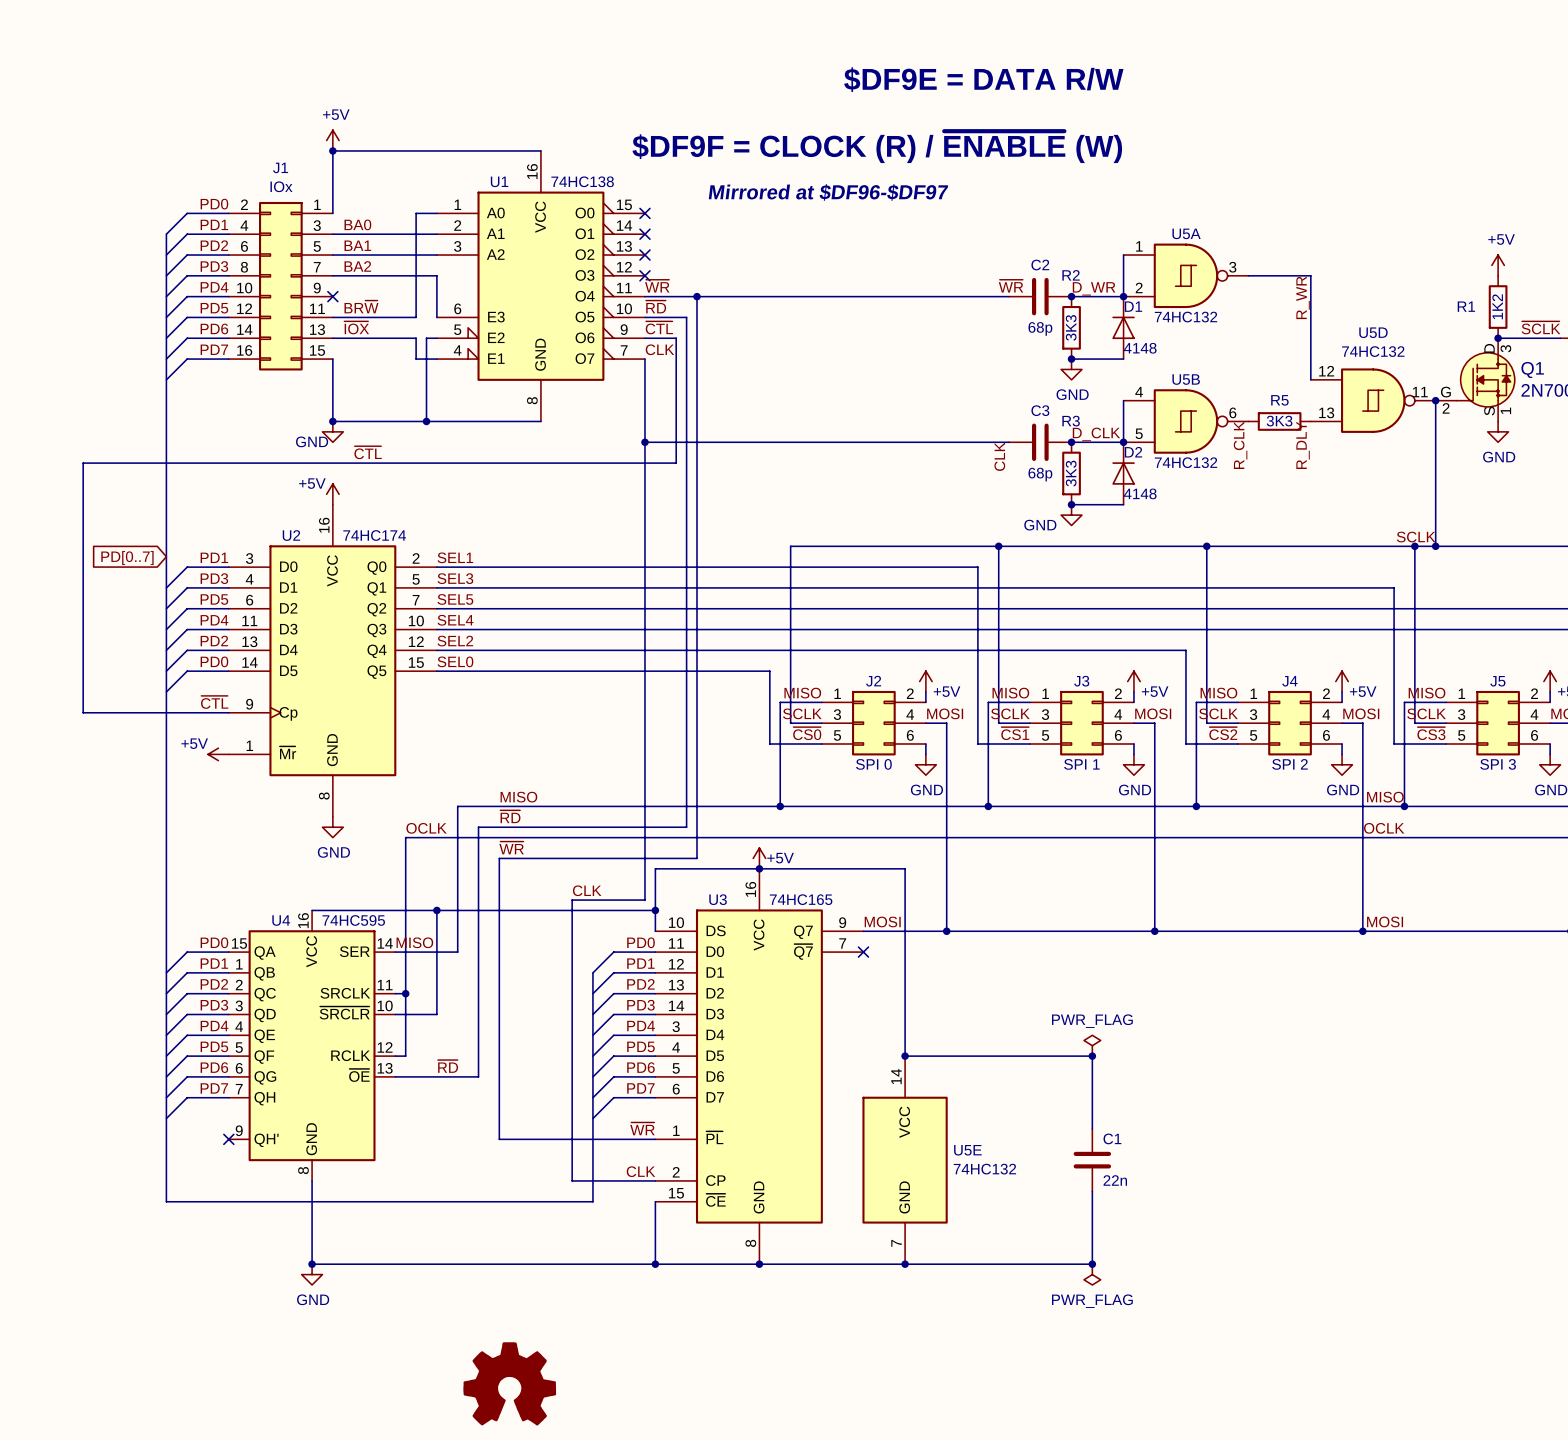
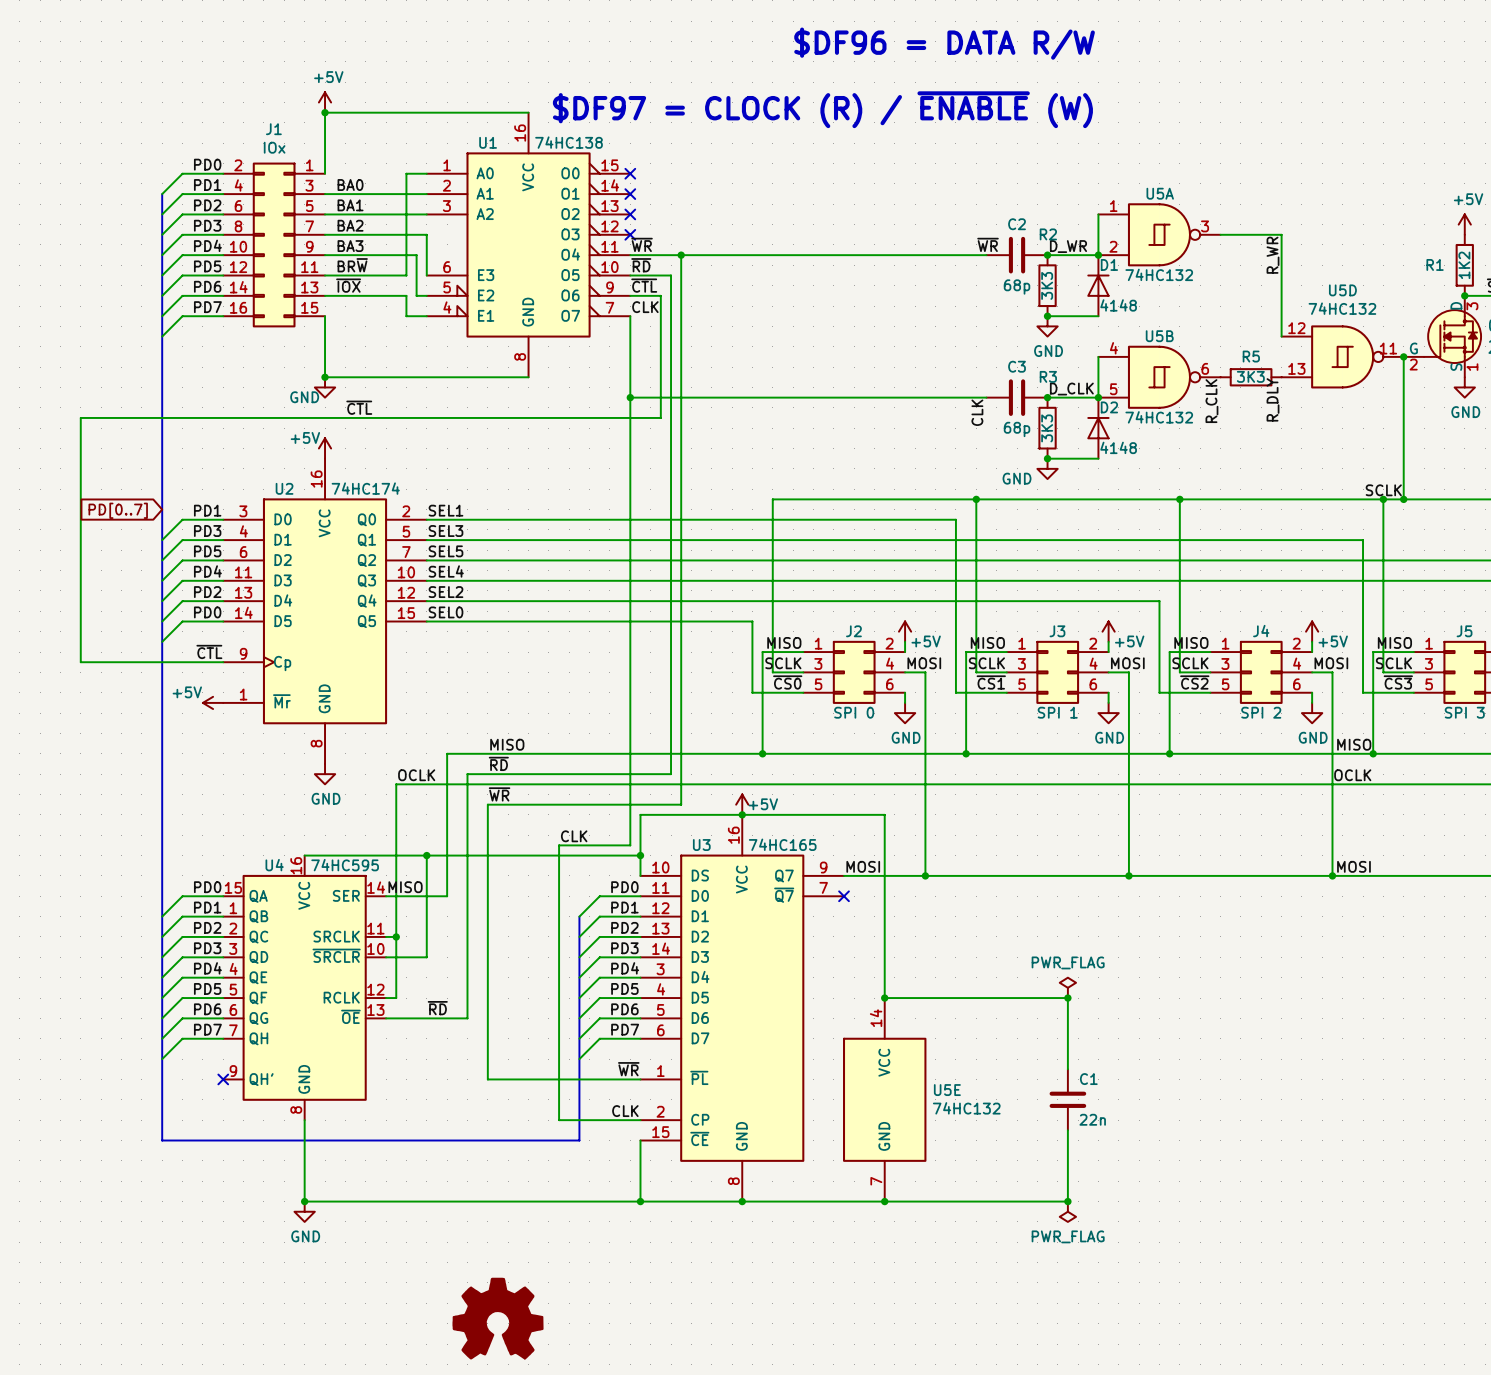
text: $DF9E = DATA R/W (983, 79) -> $DF96 = DATA R/W (944, 43)
text: $DF9F = CLOCK (R) / ~{ENABLE} (W) (877, 147) -> $DF97 = CLOCK (R) / ~{ENABLE} (W) (822, 109)
text: Mirrored at $DF96-$DF97 (828, 192) -> none
label: none -> BA3 (350, 246)
no-connect mark: (332, 296) -> none
wire: (426, 338) (426, 421) -> (416, 295) (416, 255) (325, 255)
junction: (426, 421) -> none

